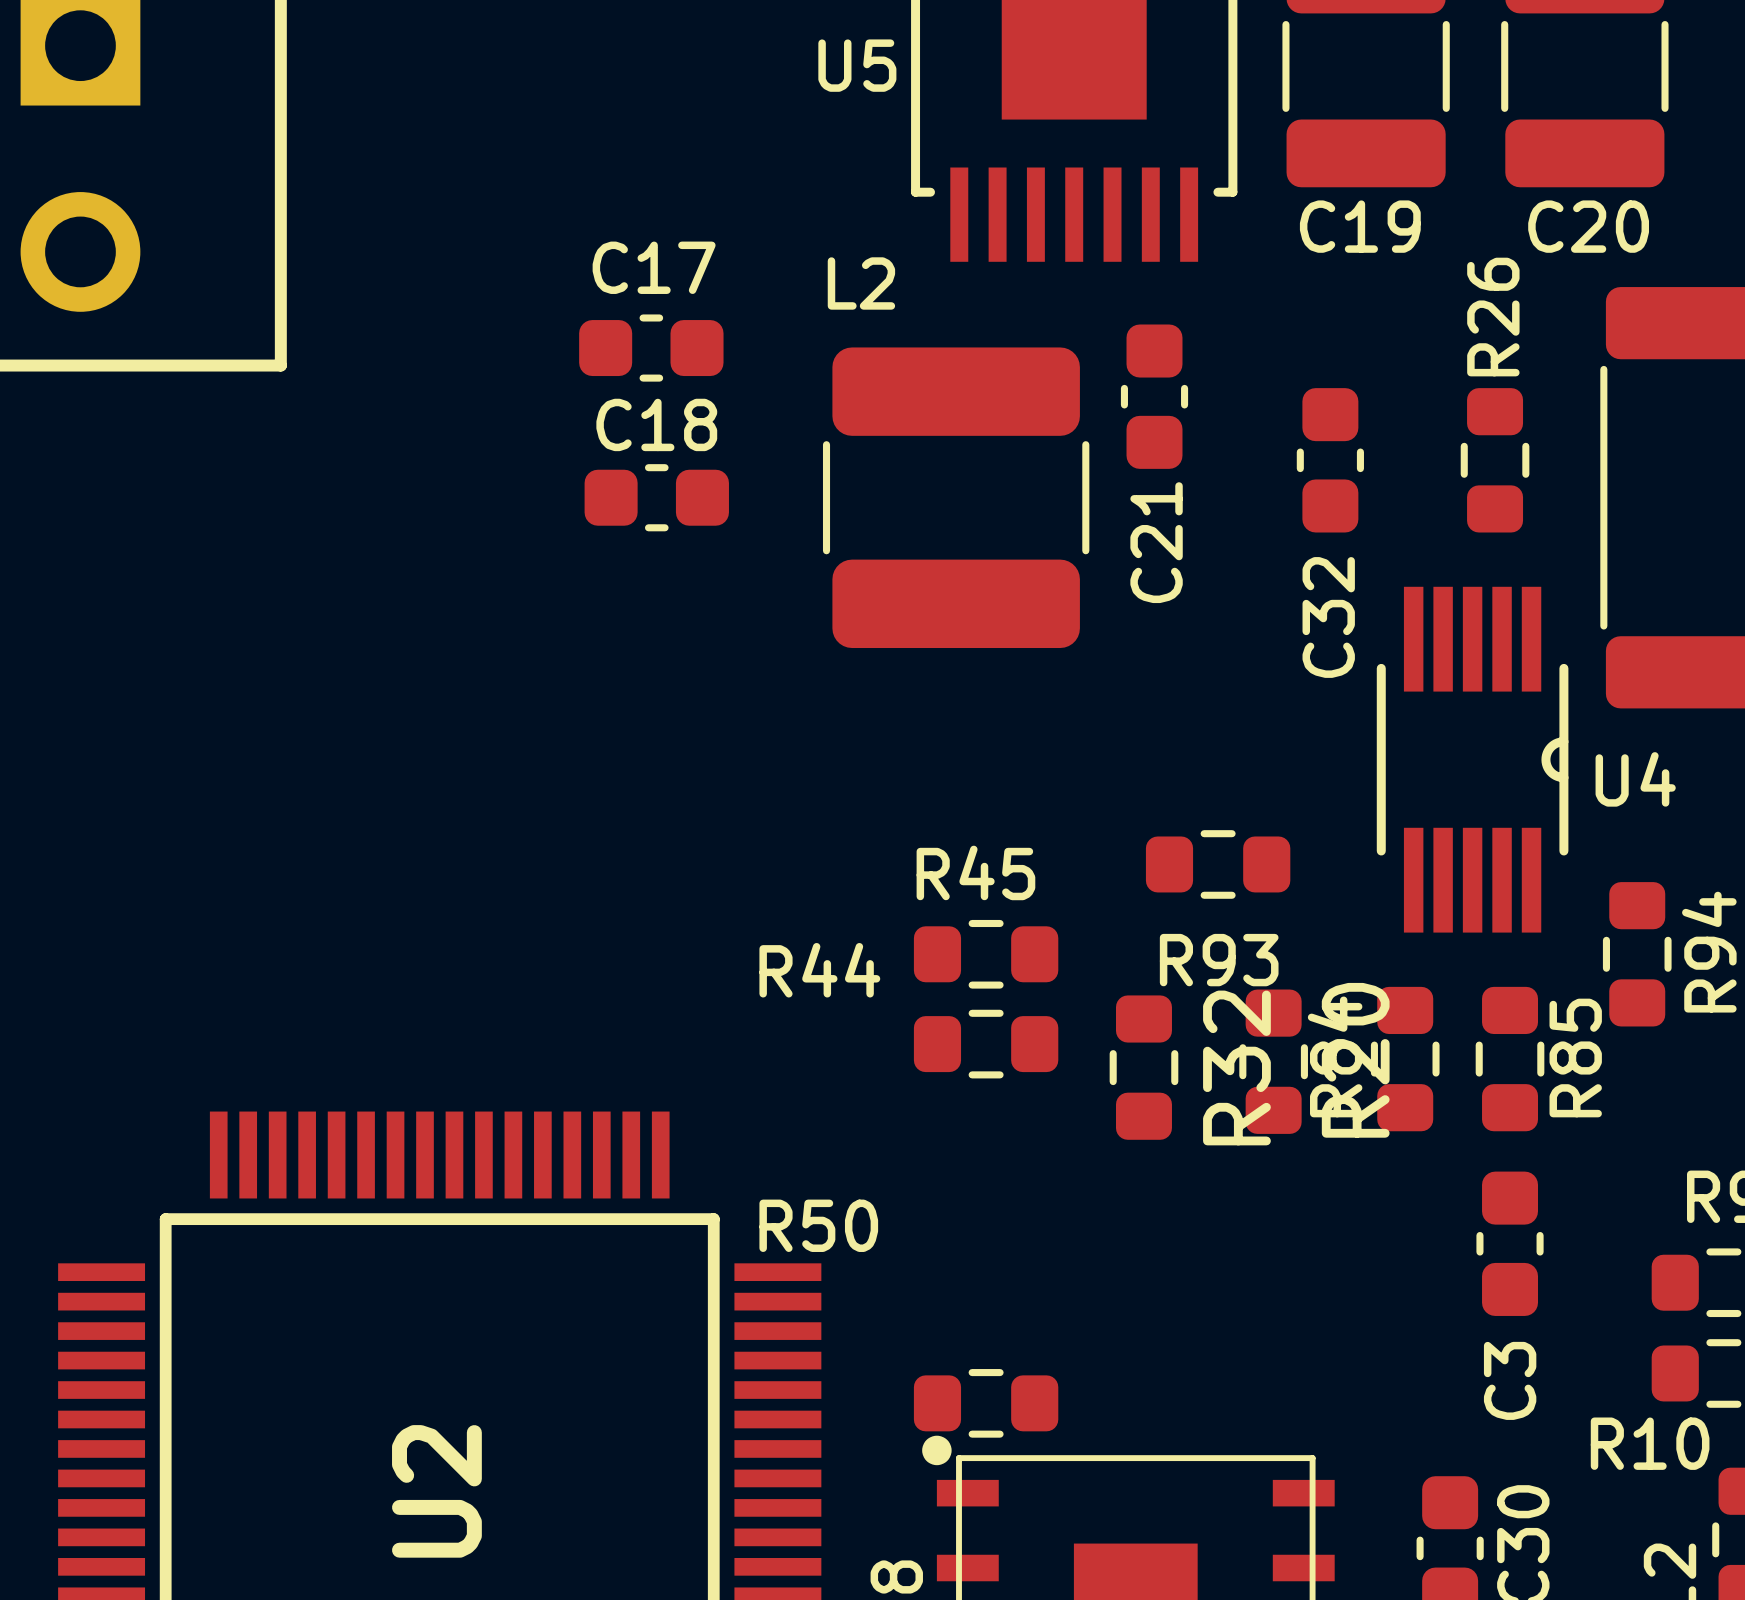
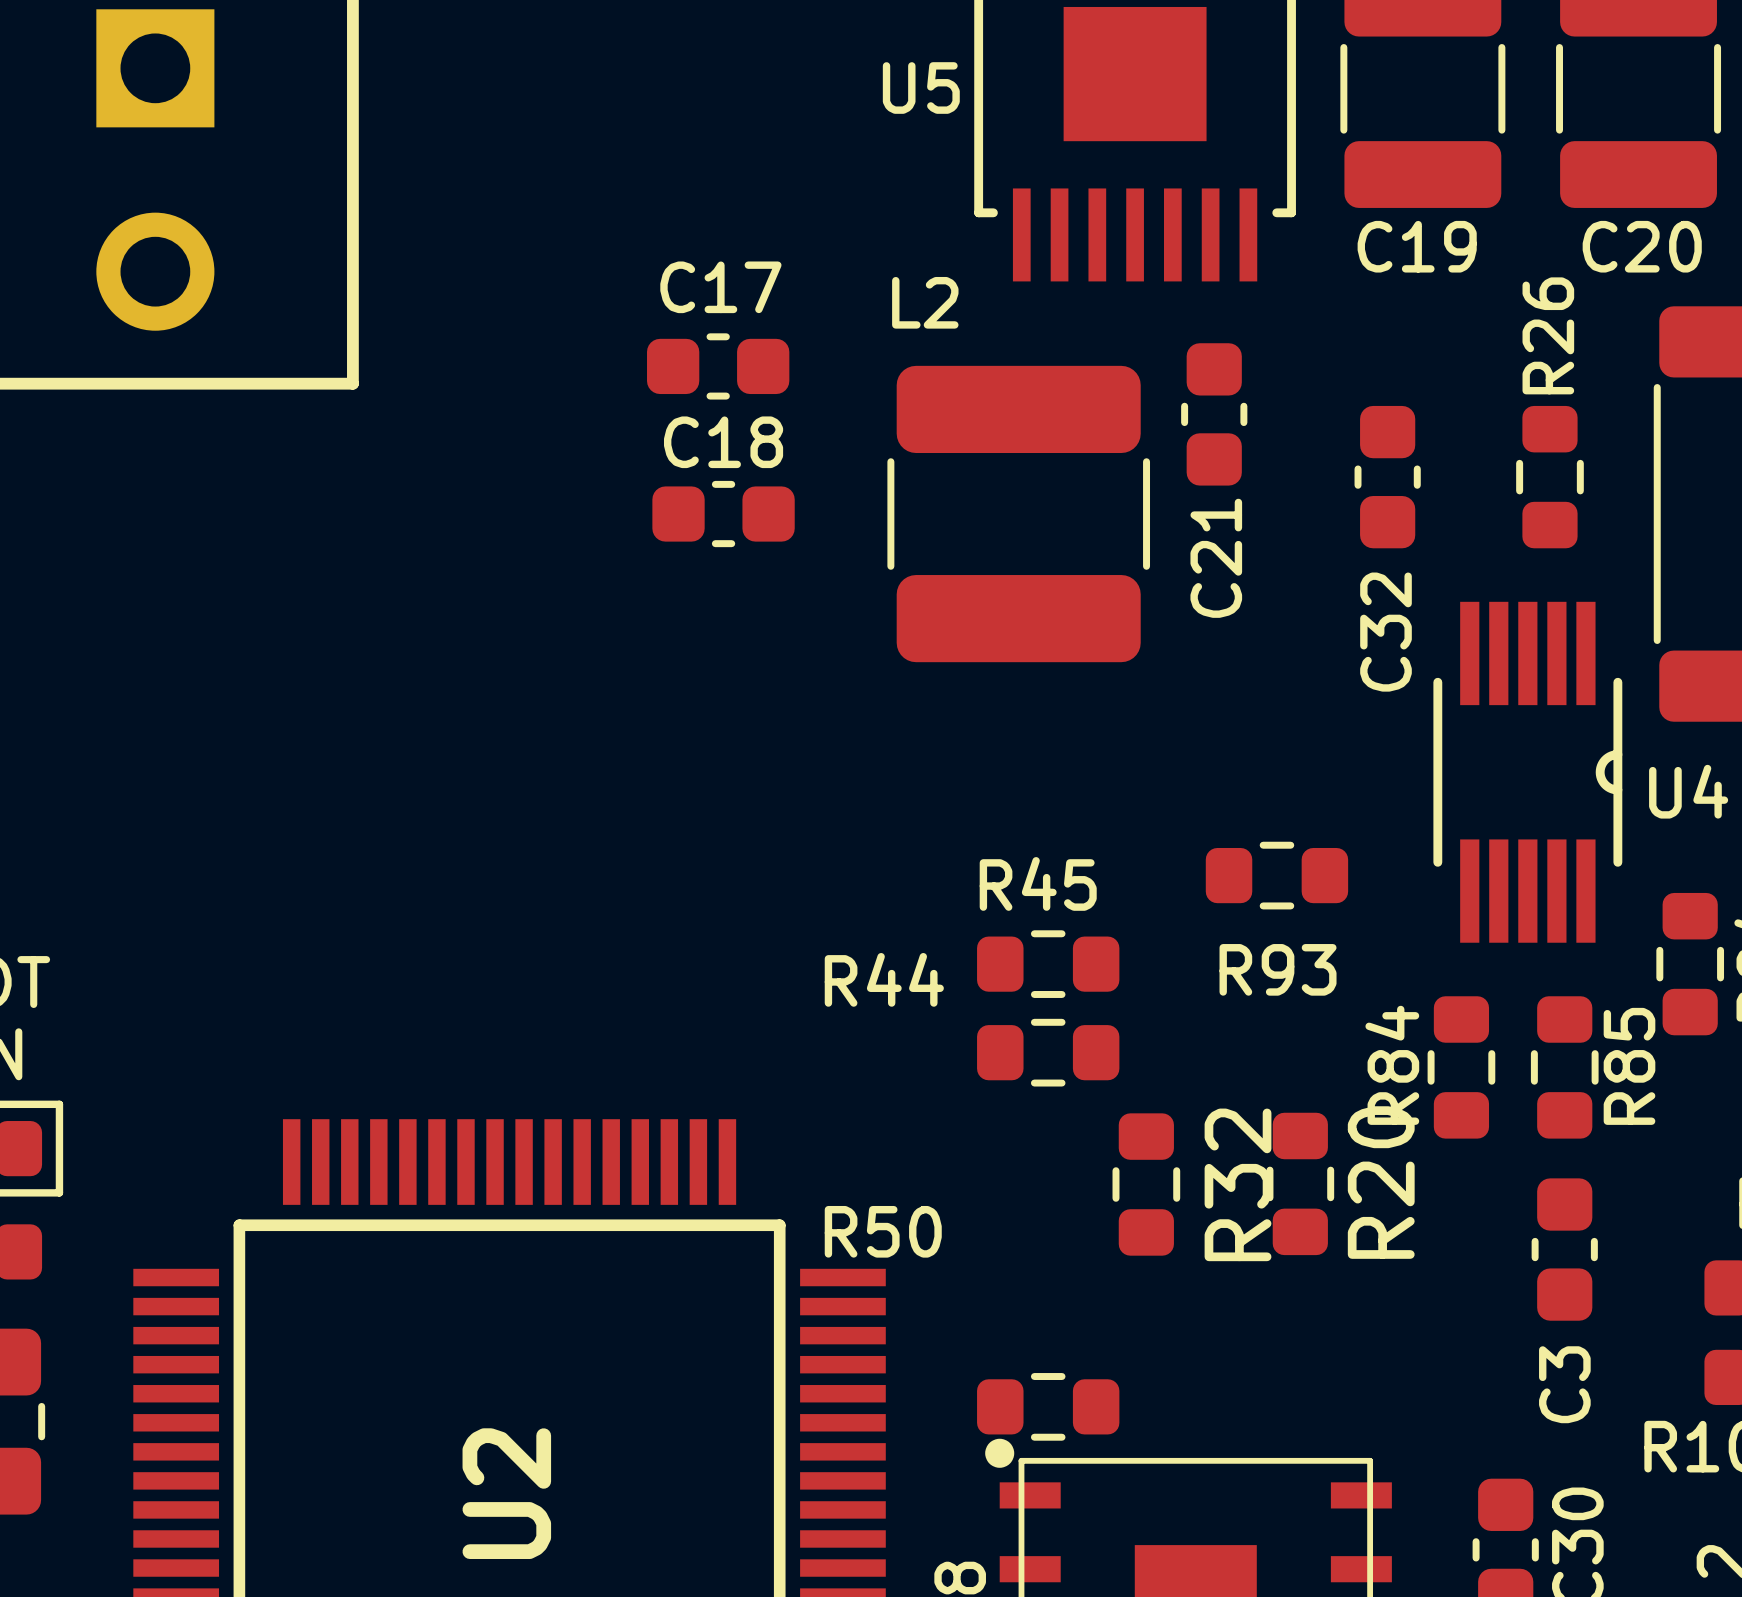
R20 position: (1273, 1061) -> (1300, 1183)
R32 position: (1143, 1067) -> (1146, 1184)

